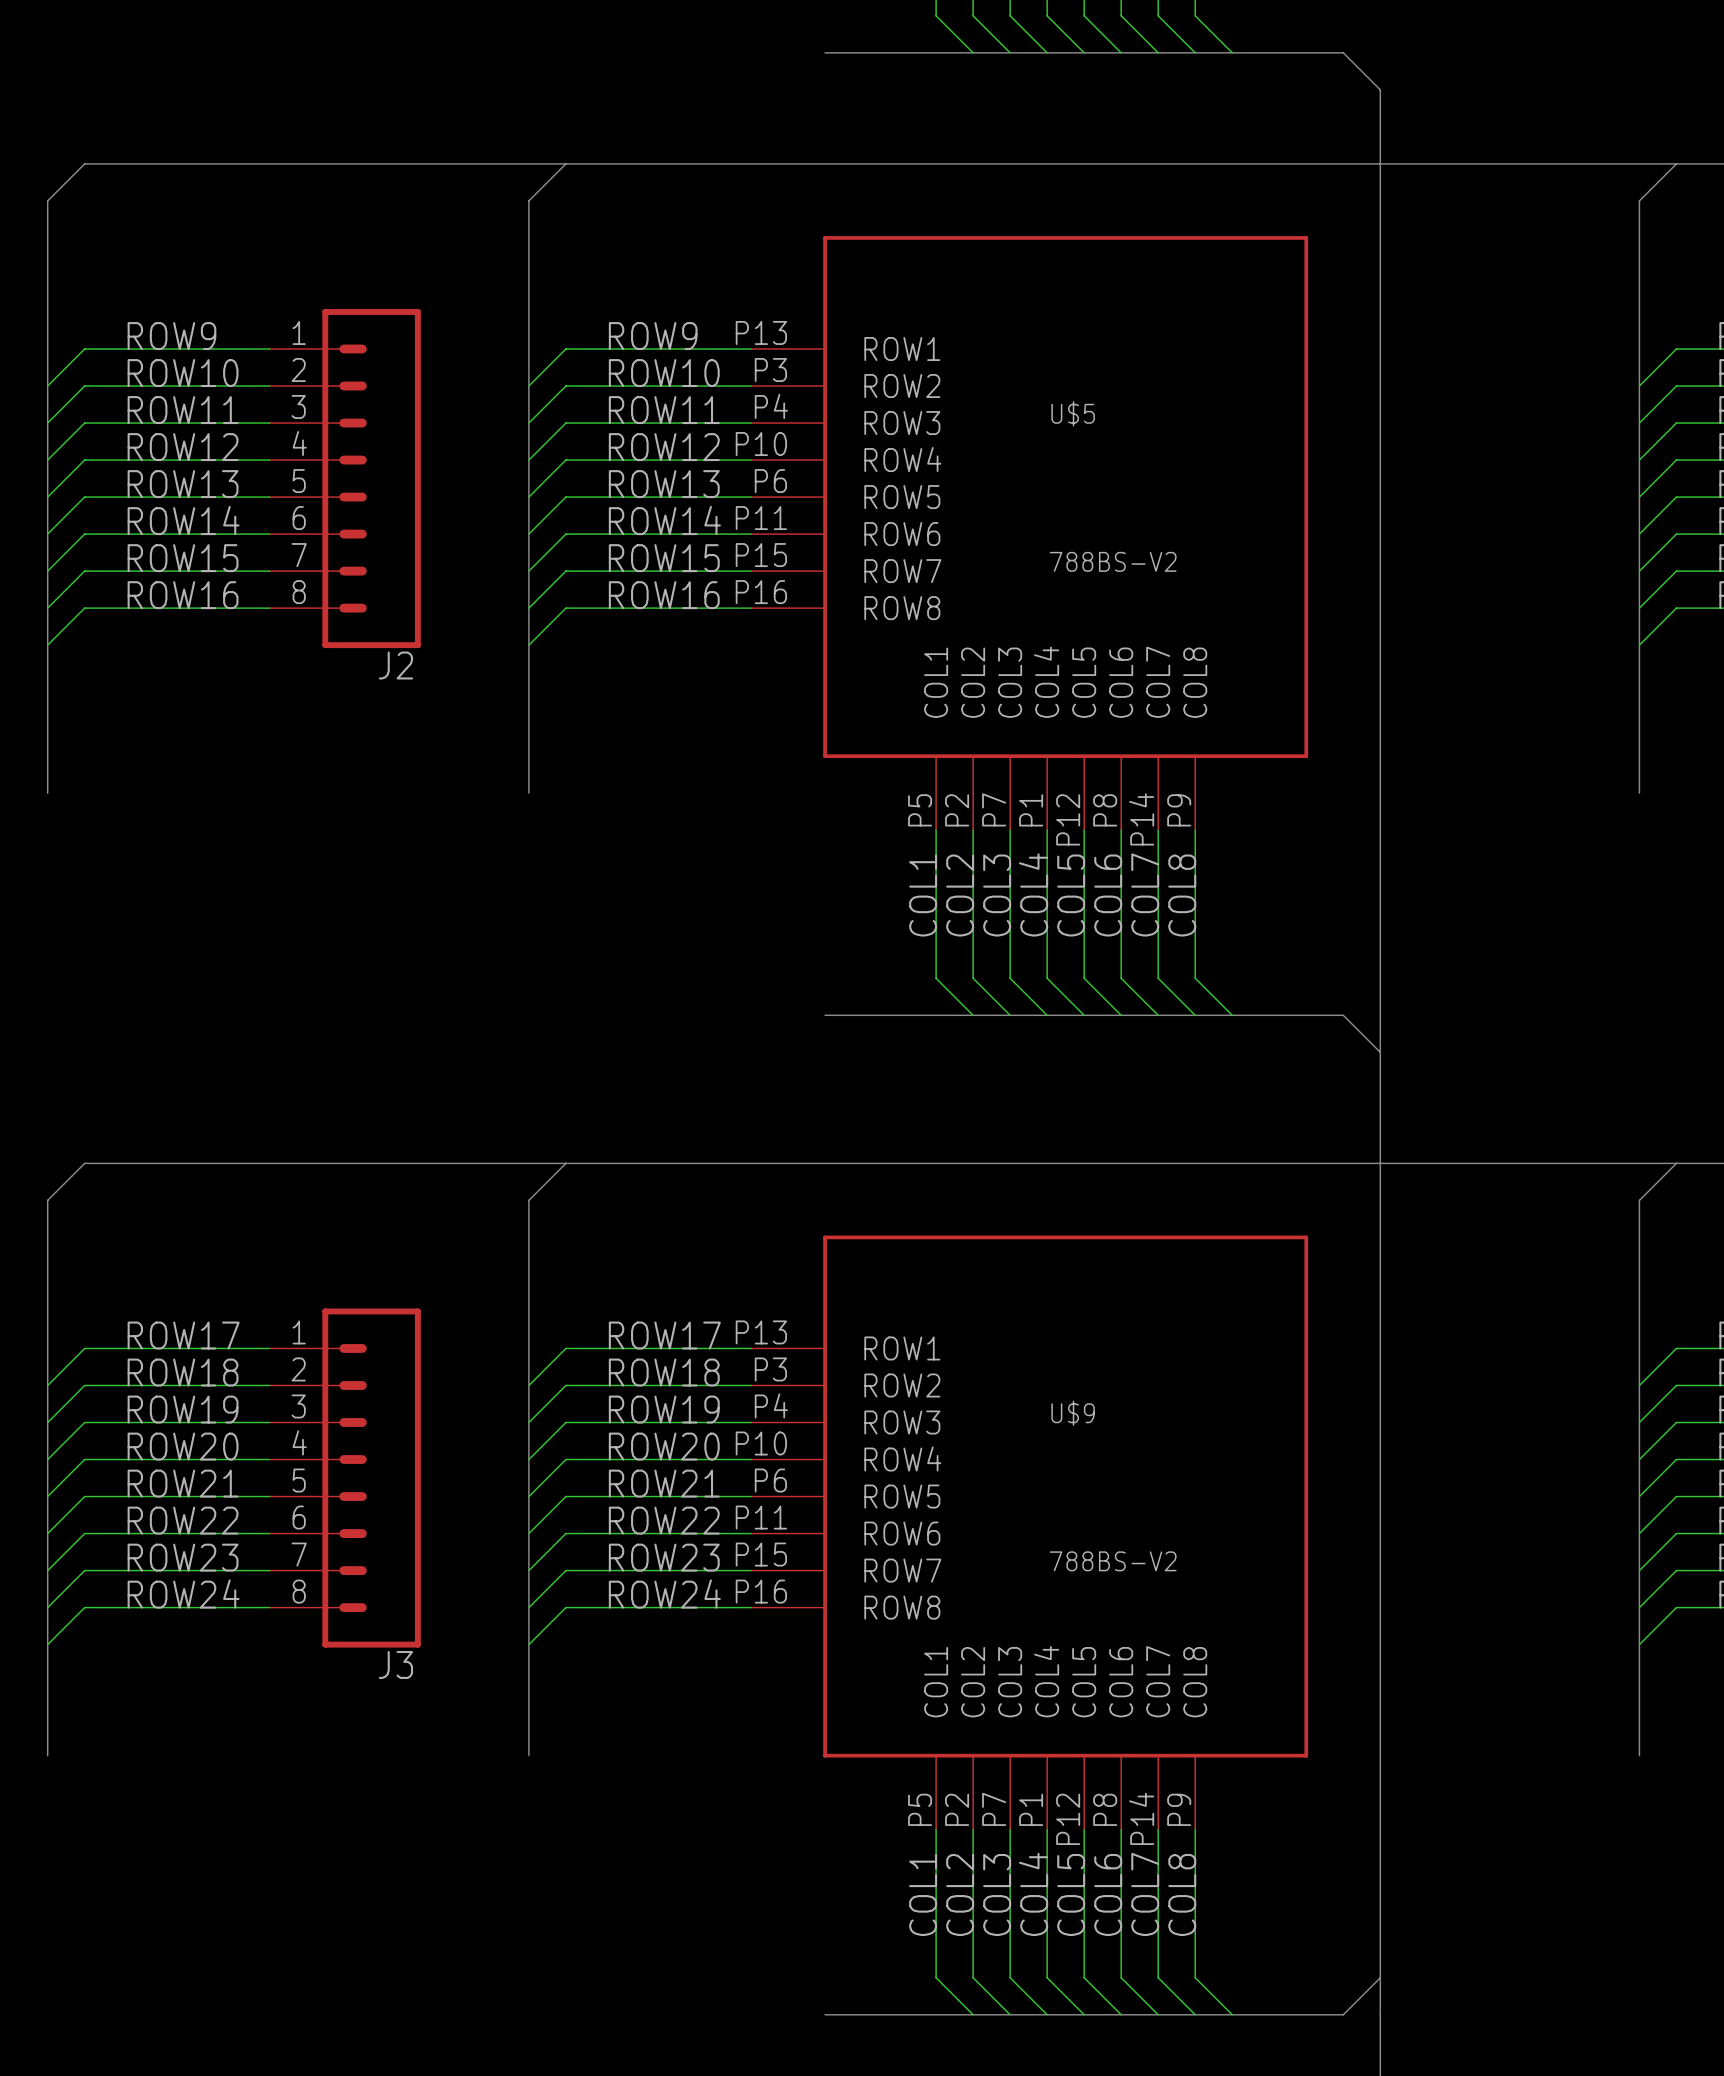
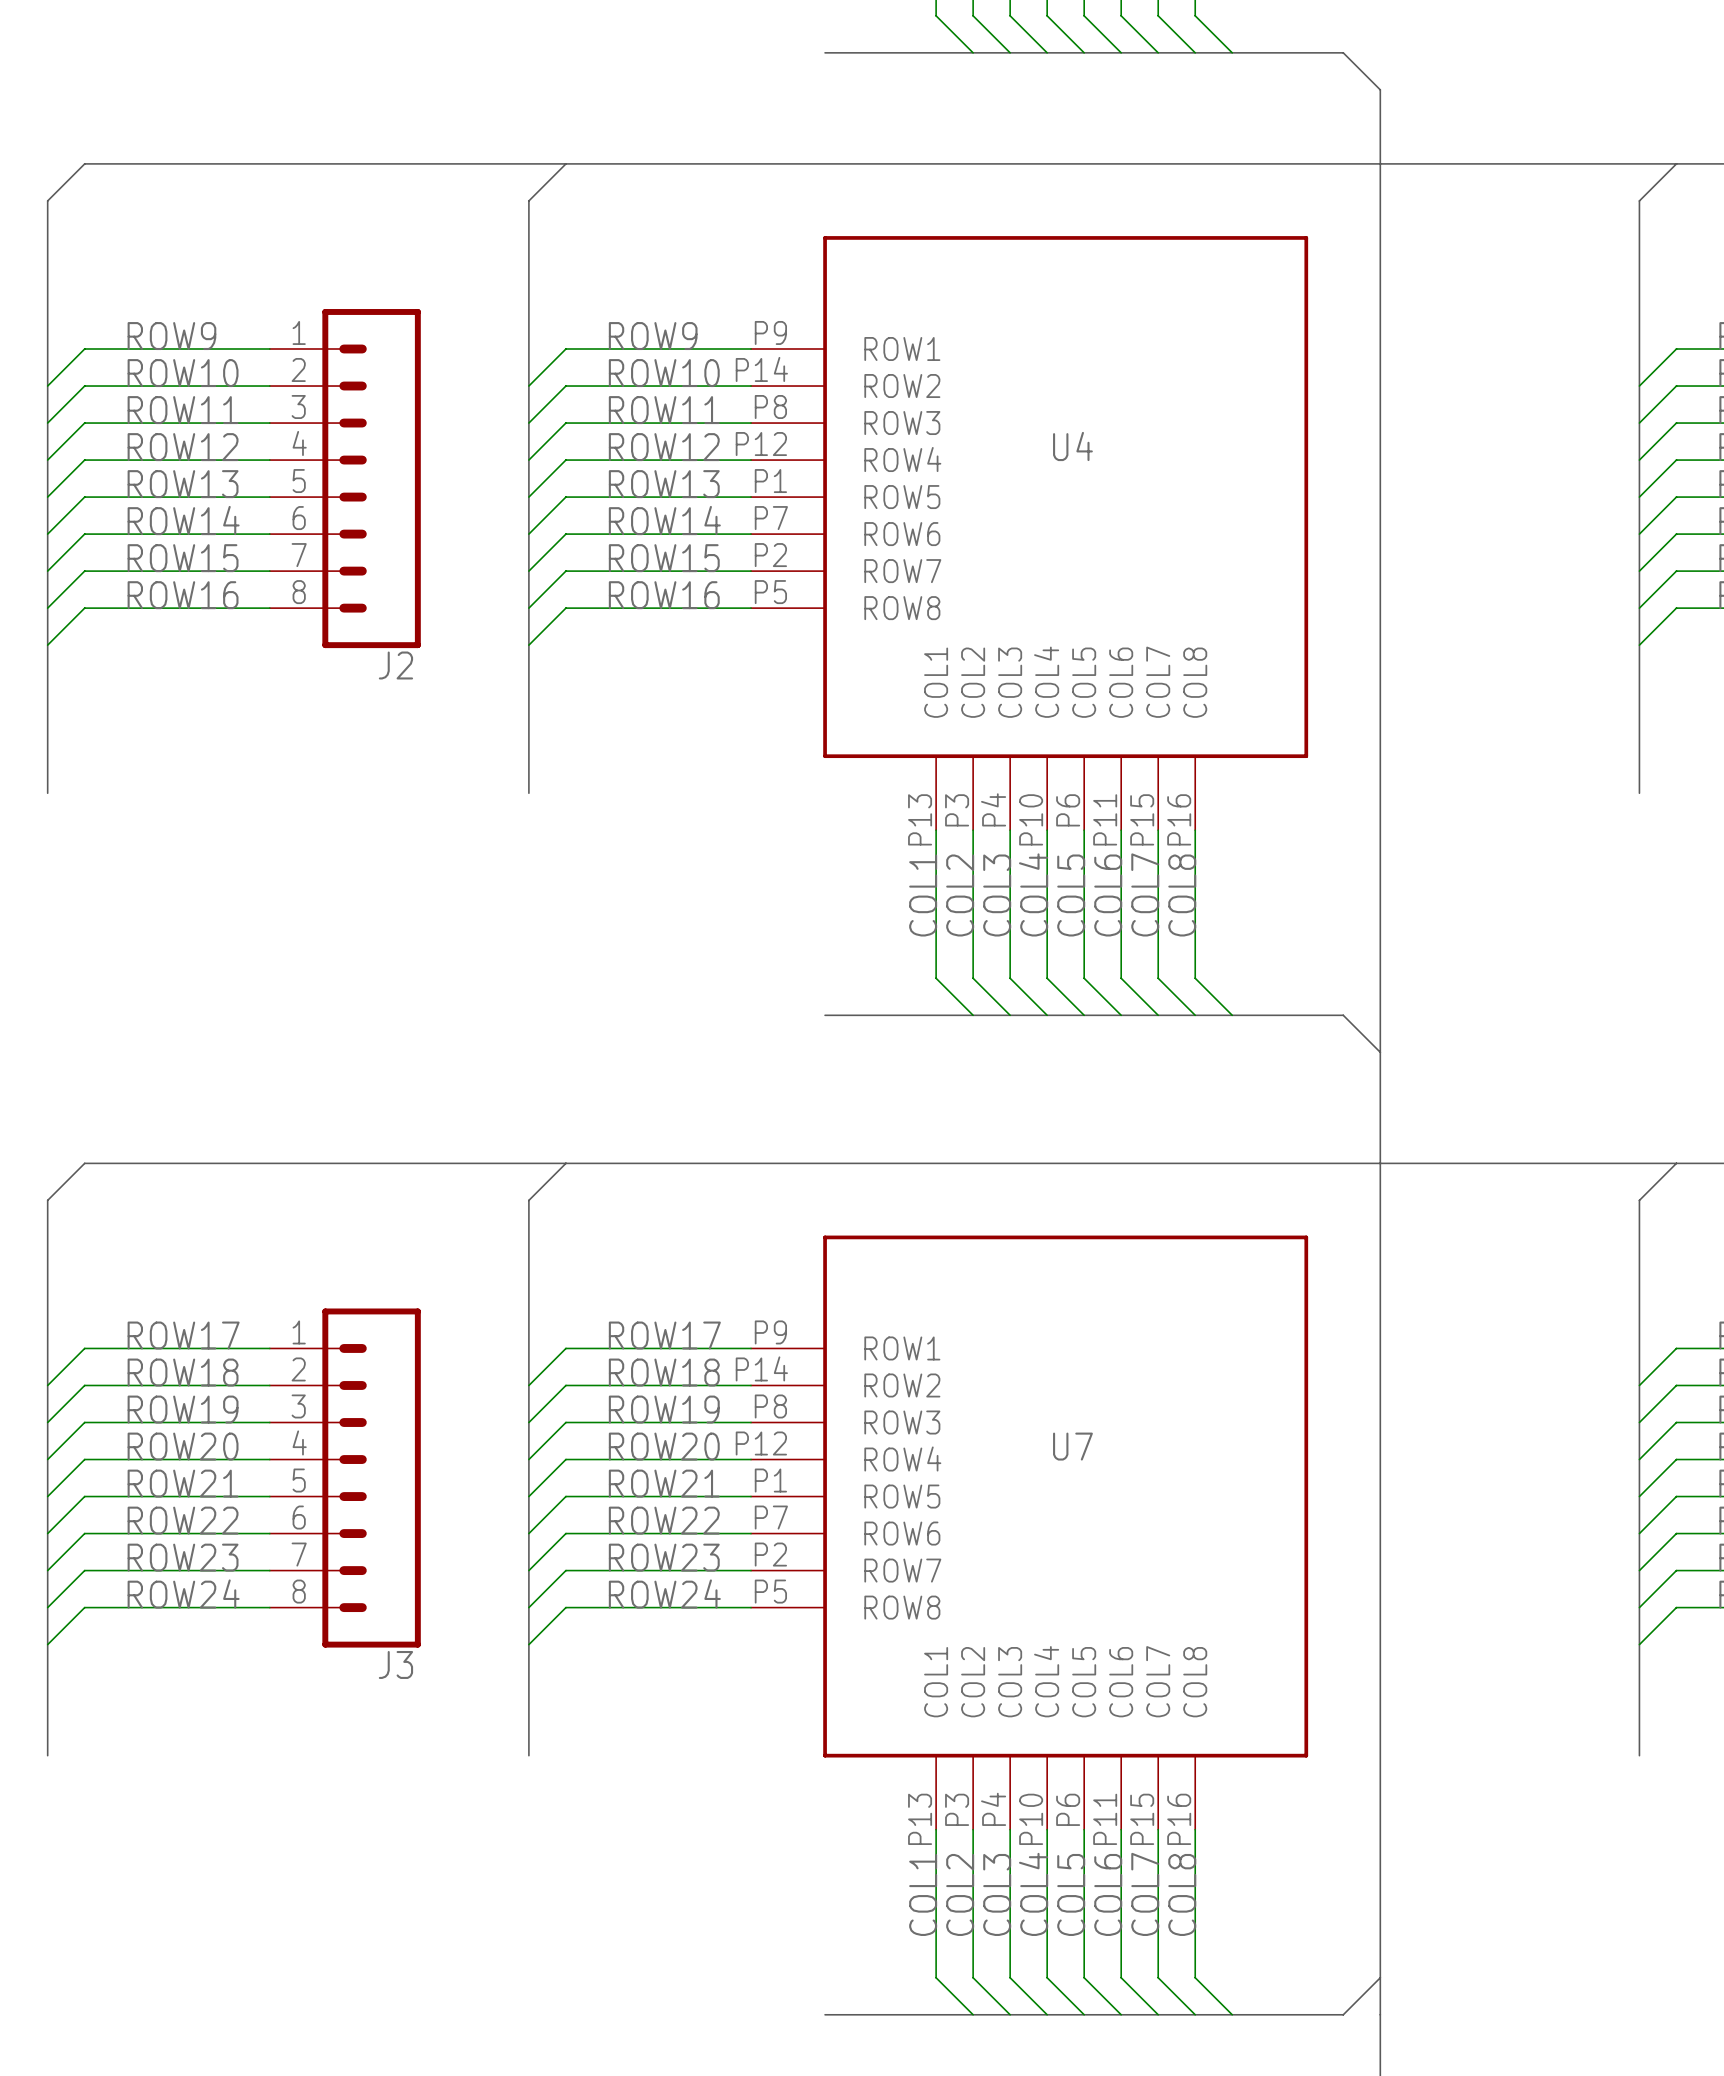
U$5 symbol: [751, 236, 1309, 831] -> [751, 236, 1309, 831]
U$5 name: U$5 (1073, 413) -> none
text: none -> U4 (1072, 446)
U$5 value: 788BS-V2 (1113, 561) -> none
U$9 symbol: [751, 1235, 1309, 1830] -> [751, 1235, 1309, 1830]
U$9 name: U$9 (1073, 1413) -> none
text: none -> U7 (1072, 1446)
U$9 value: 788BS-V2 (1113, 1561) -> none

